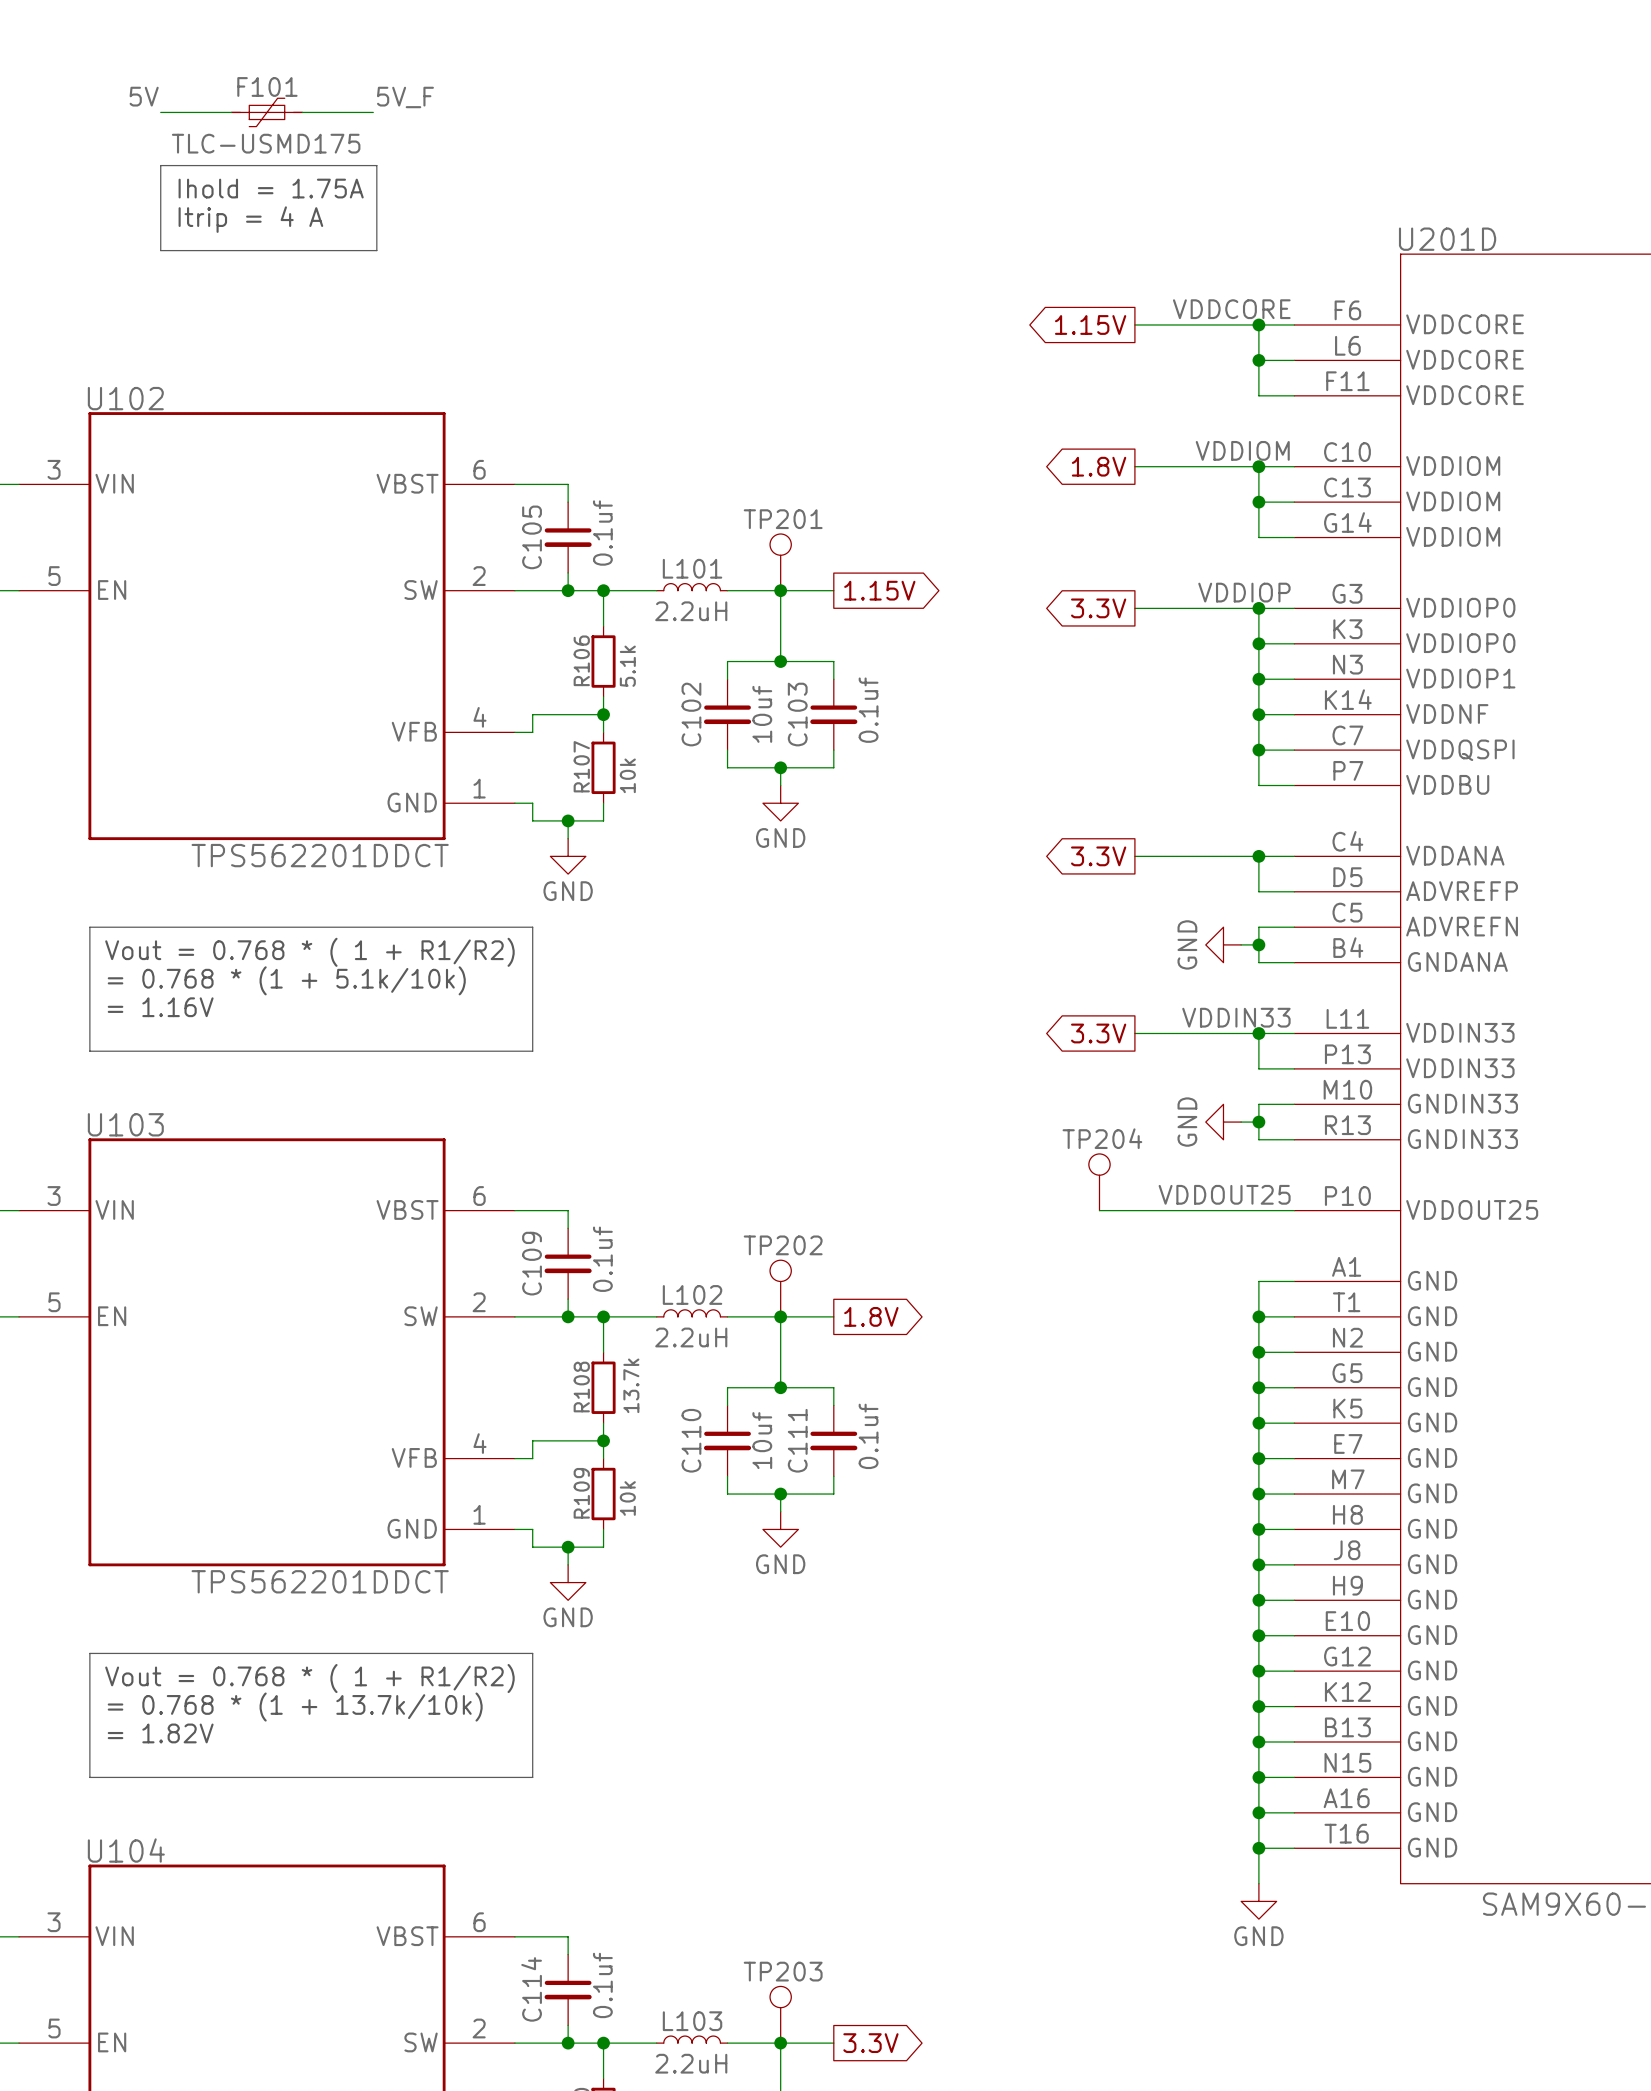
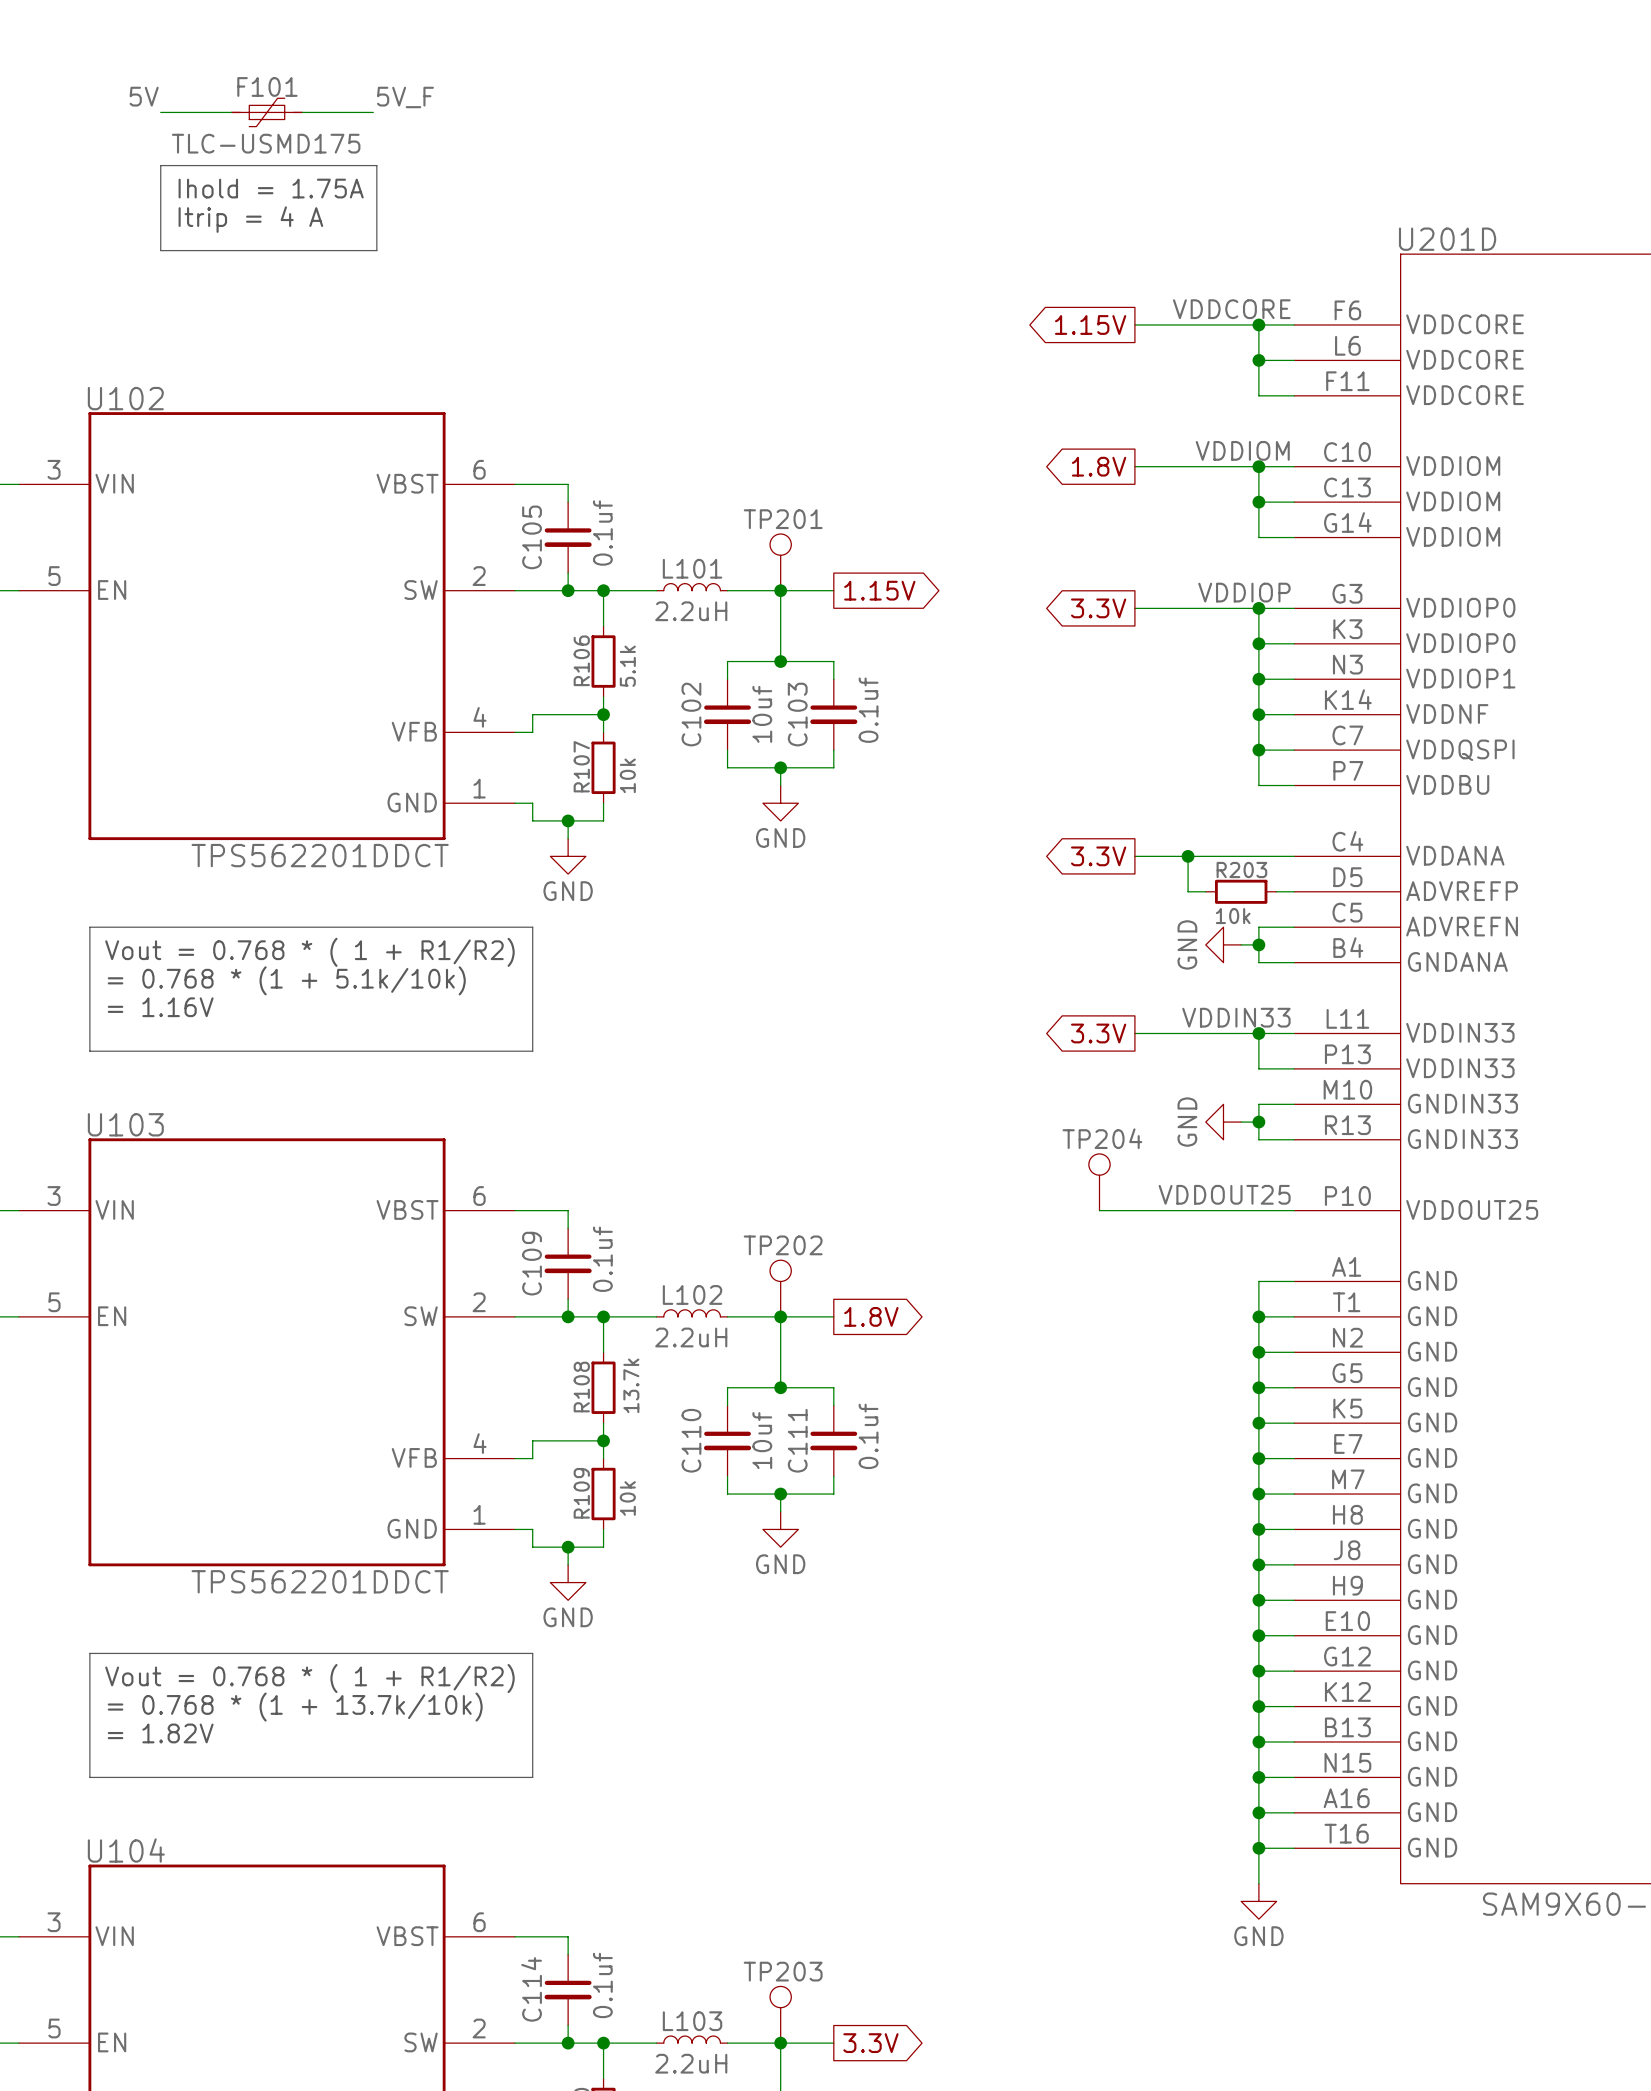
wire: (1258, 856) (1258, 891) (1276, 891) -> (1188, 856) (1188, 891) (1205, 891)
junction position: (1258, 856) -> (1188, 856)
R203: none -> 10k (1241, 891)

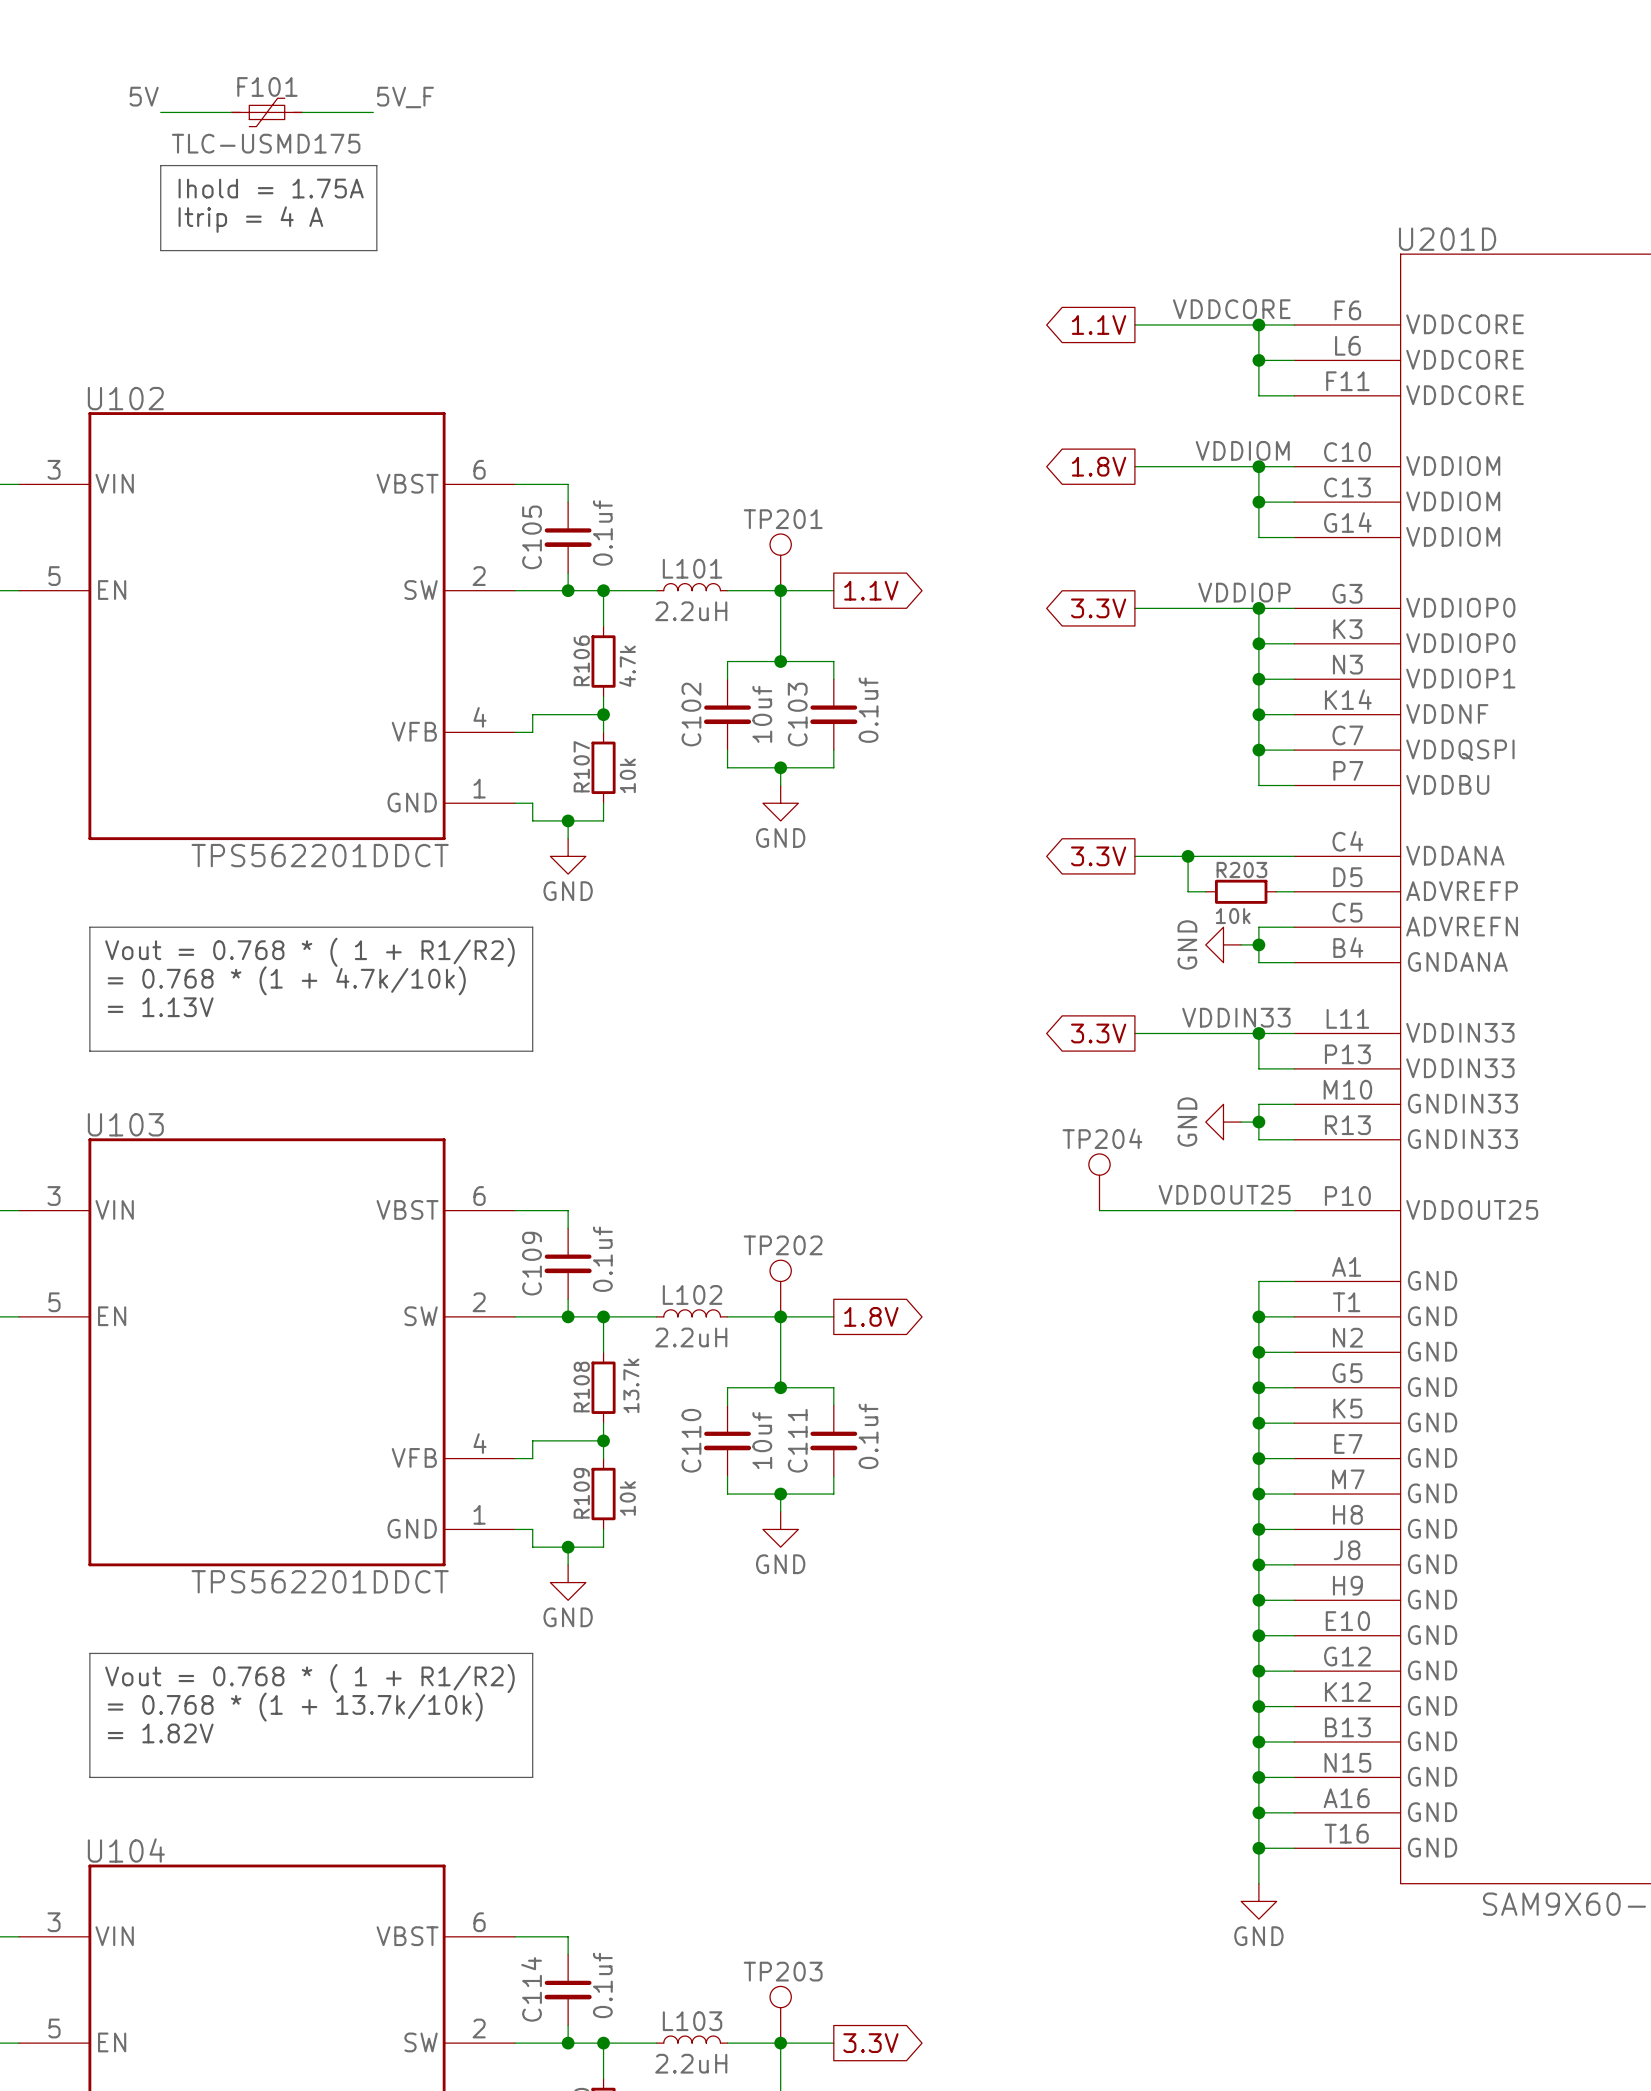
global label: 1.15V (1090, 324) -> 1.1V (1099, 324)
global label: 1.15V (879, 590) -> 1.1V (871, 590)
R106 value: 5.1k (627, 666) -> 4.7k (627, 666)
text: = 0.768 * (1 + 5.1k/10k) (286, 980) -> = 0.768 * (1 + 4.7k/10k) (286, 980)
text: = 1.16V (160, 1007) -> = 1.13V (160, 1007)

